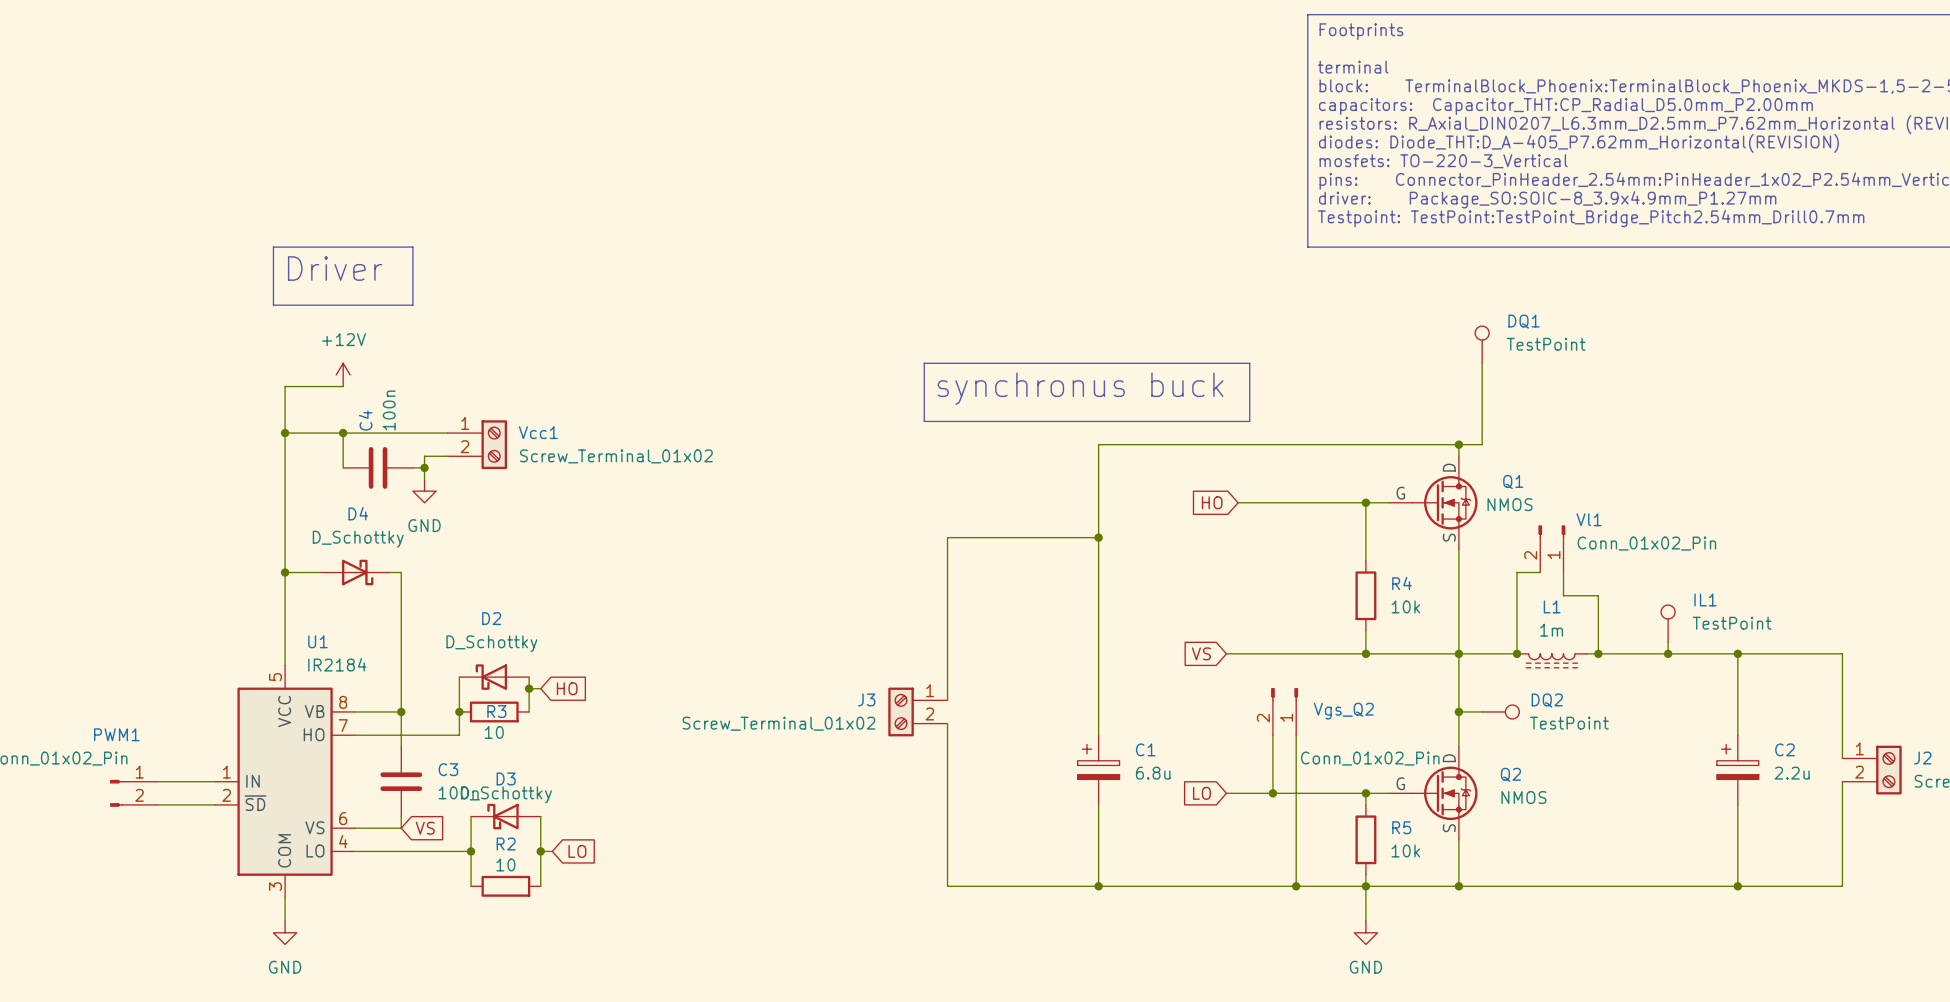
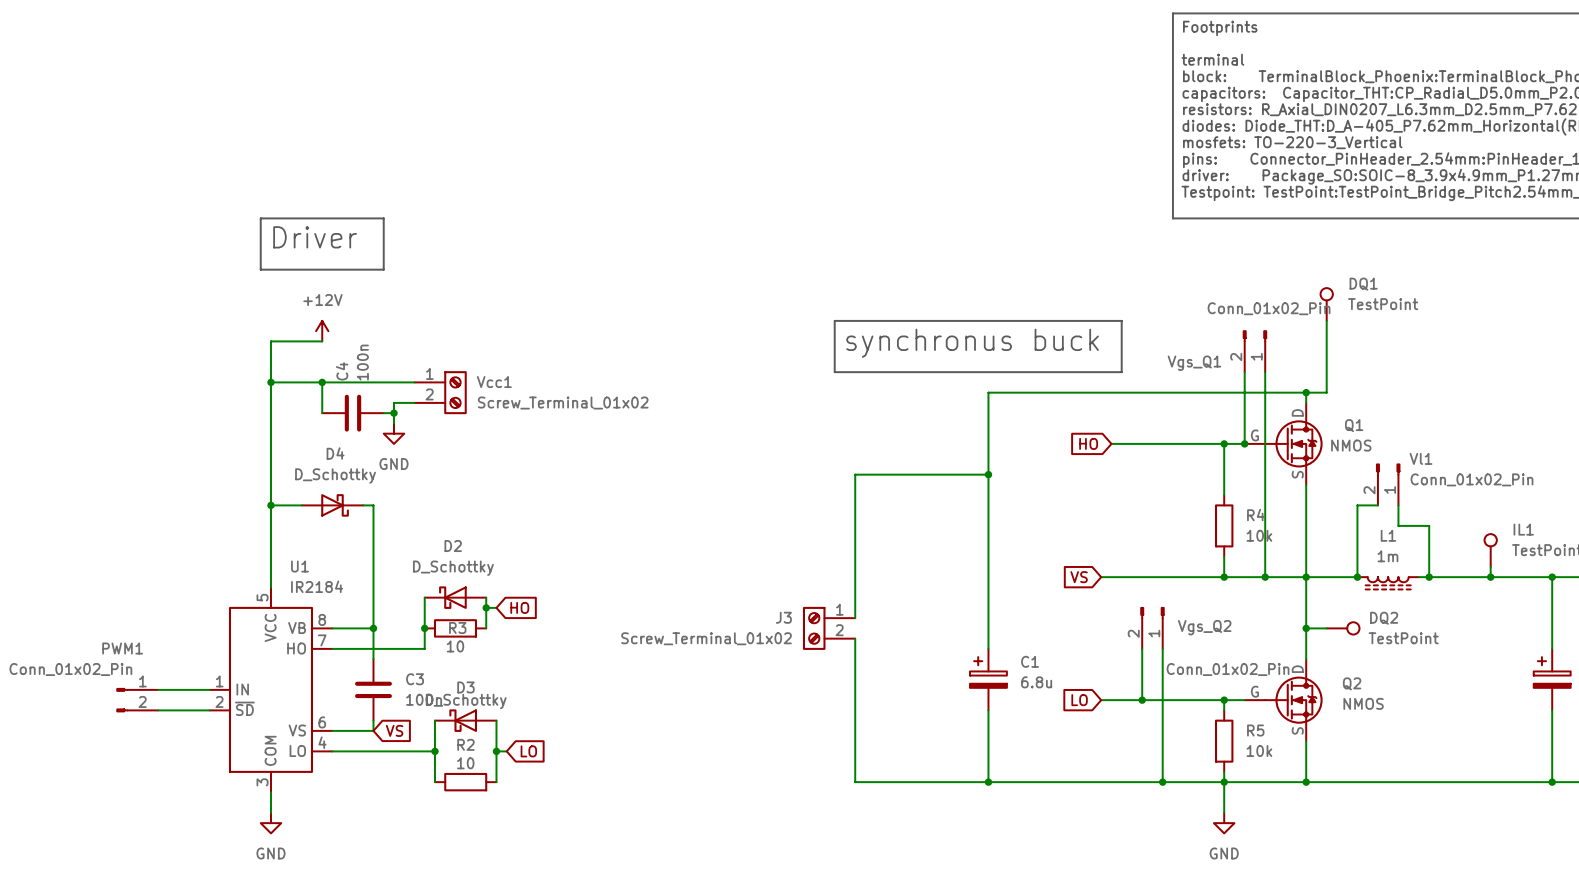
Vgs_Q1: none -> Conn_01x02_Pin (1254, 351)
wire: none -> (1244, 372) (1244, 443)
wire: none -> (1265, 372) (1265, 577)
junction: none -> (1244, 443)
junction: none -> (1265, 577)

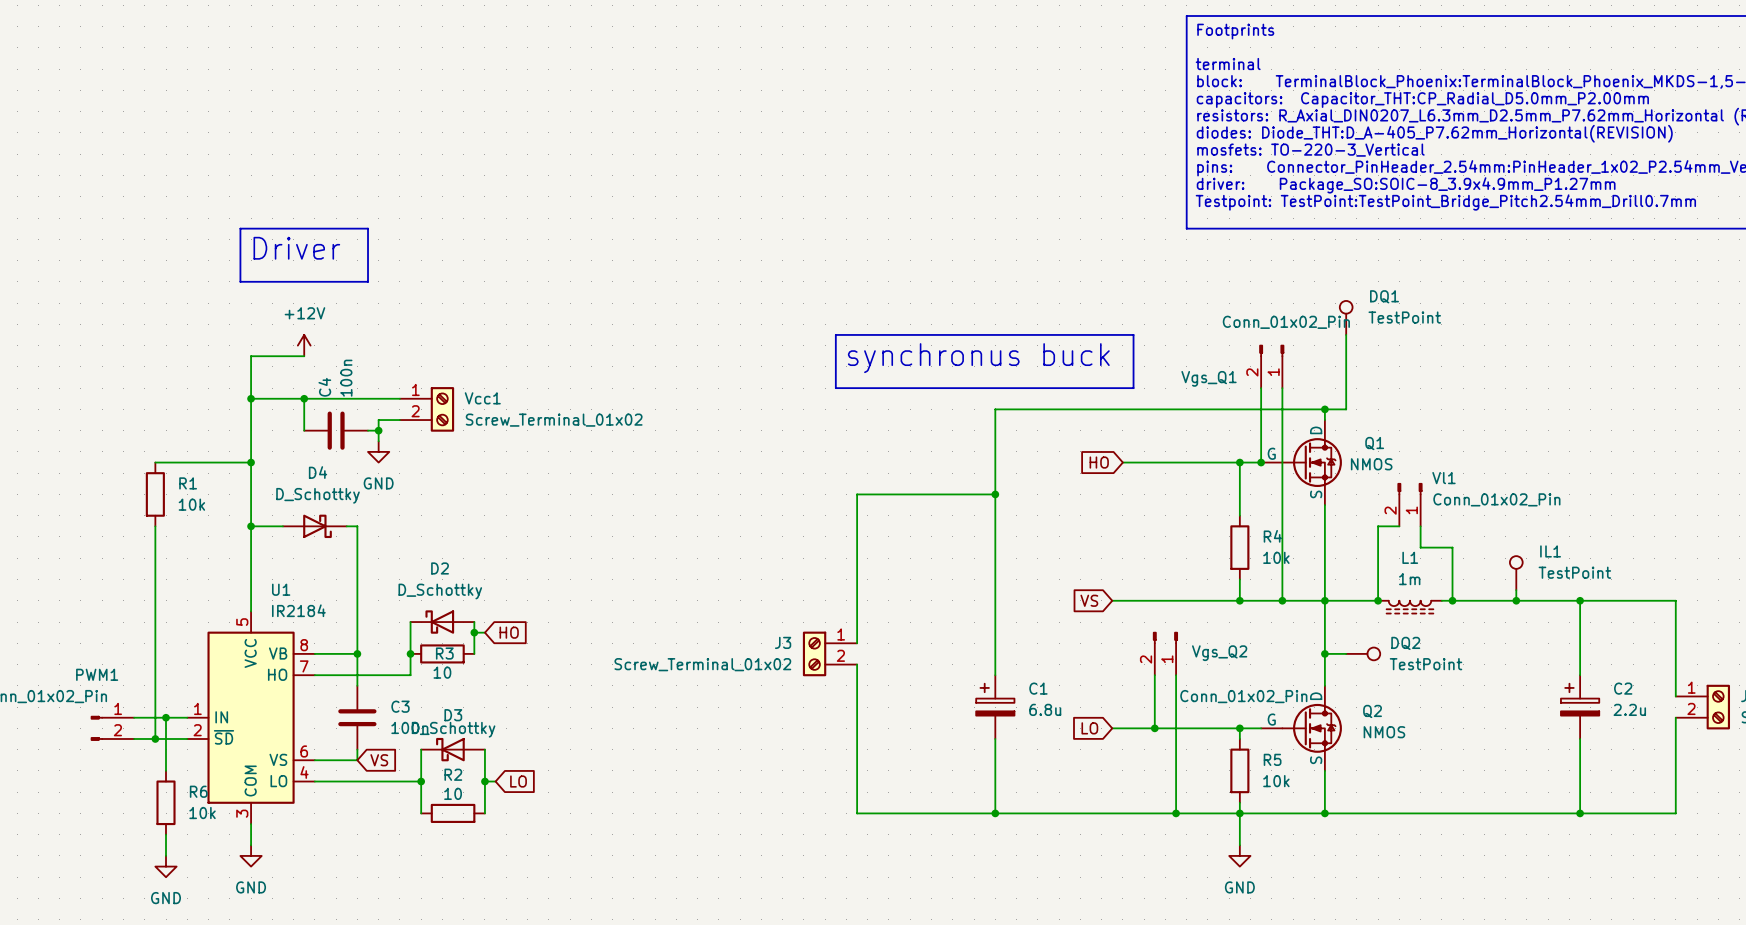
wire: none -> (155, 462) (251, 462)
junction: none -> (251, 462)
R1: none -> 10k (155, 494)
wire: none -> (155, 526) (155, 738)
wire: none -> (166, 717) (166, 770)
junction: none -> (166, 717)
junction: none -> (155, 738)
R6: none -> 10k (166, 802)
wire: none -> (166, 834) (166, 855)
power symbol: none -> GND (166, 866)

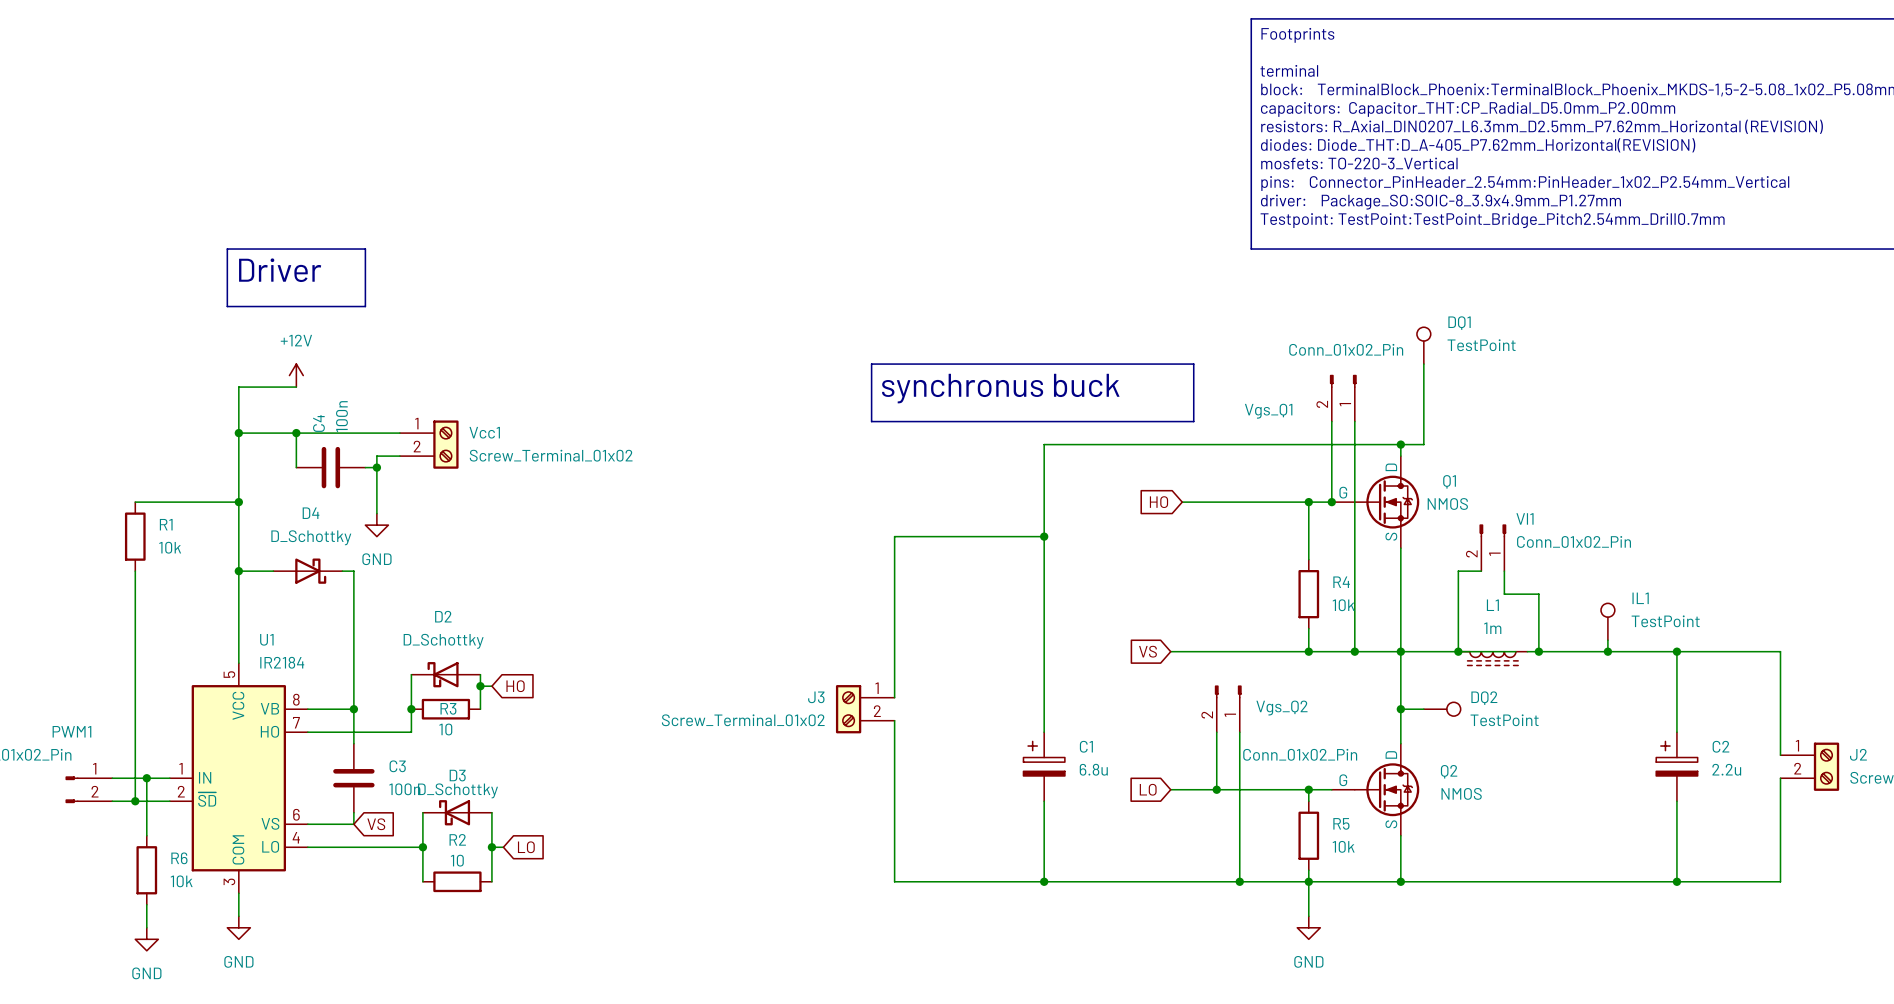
wire: none -> (376, 479) (376, 513)
power symbol position: GND (378, 451) -> GND (376, 525)
wire: none -> (1458, 651) (1515, 651)

